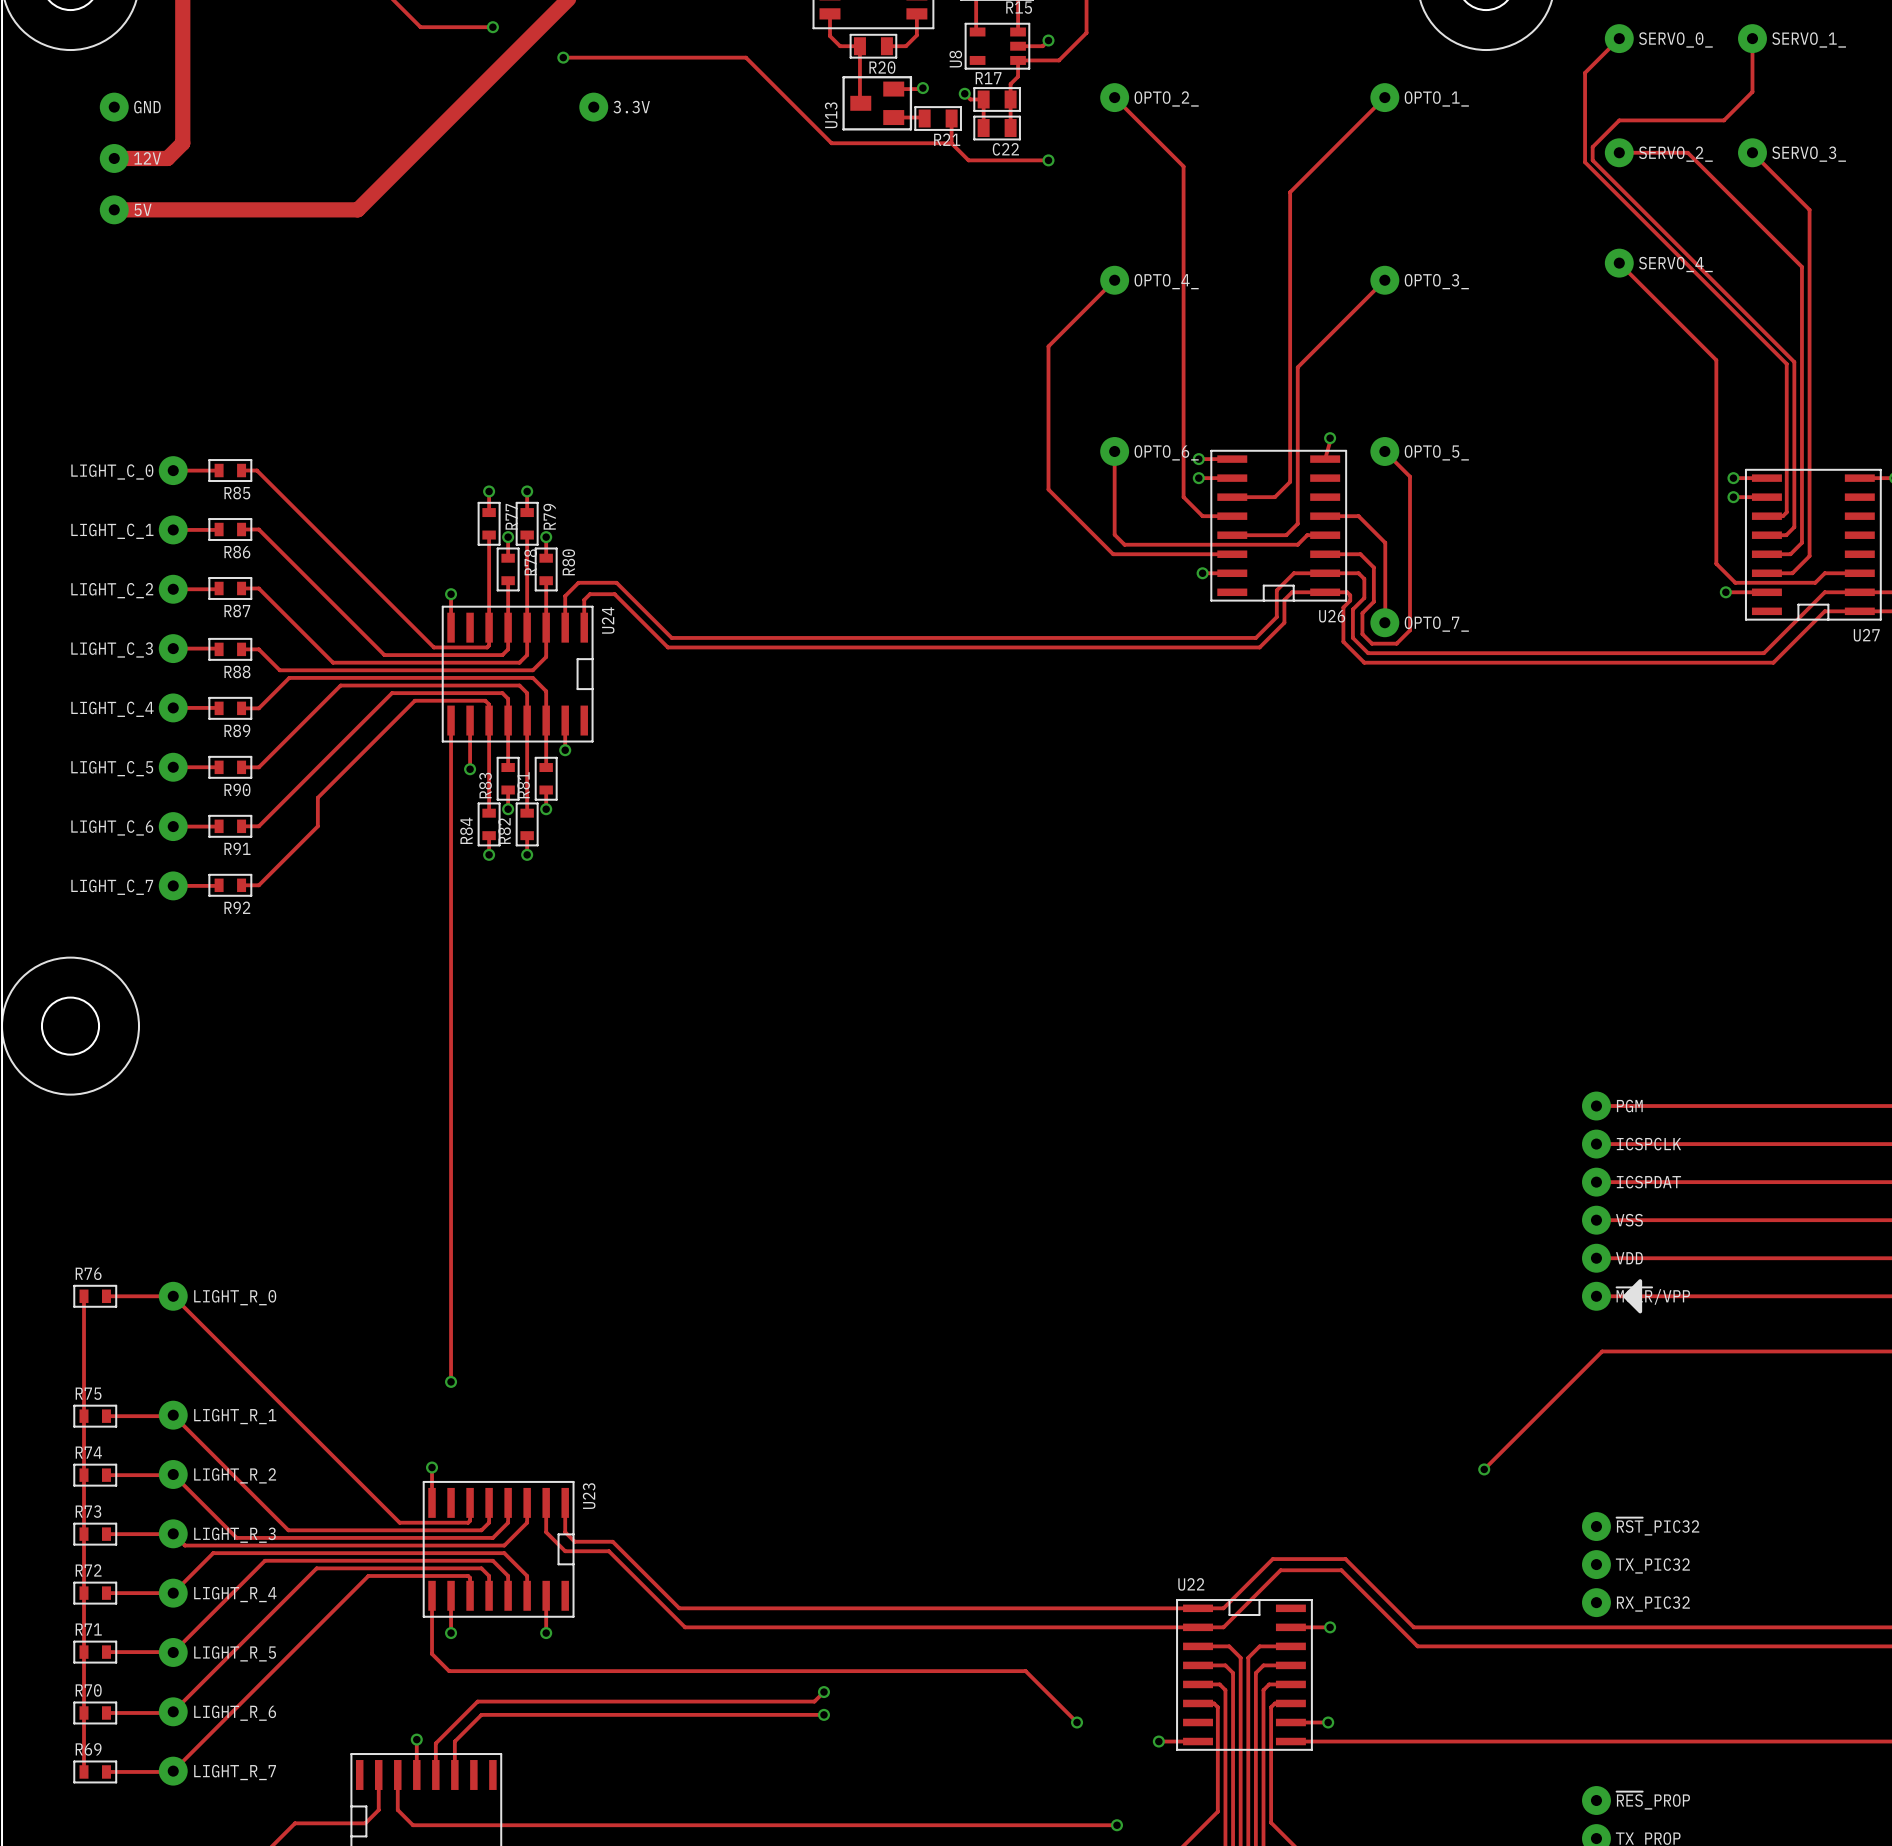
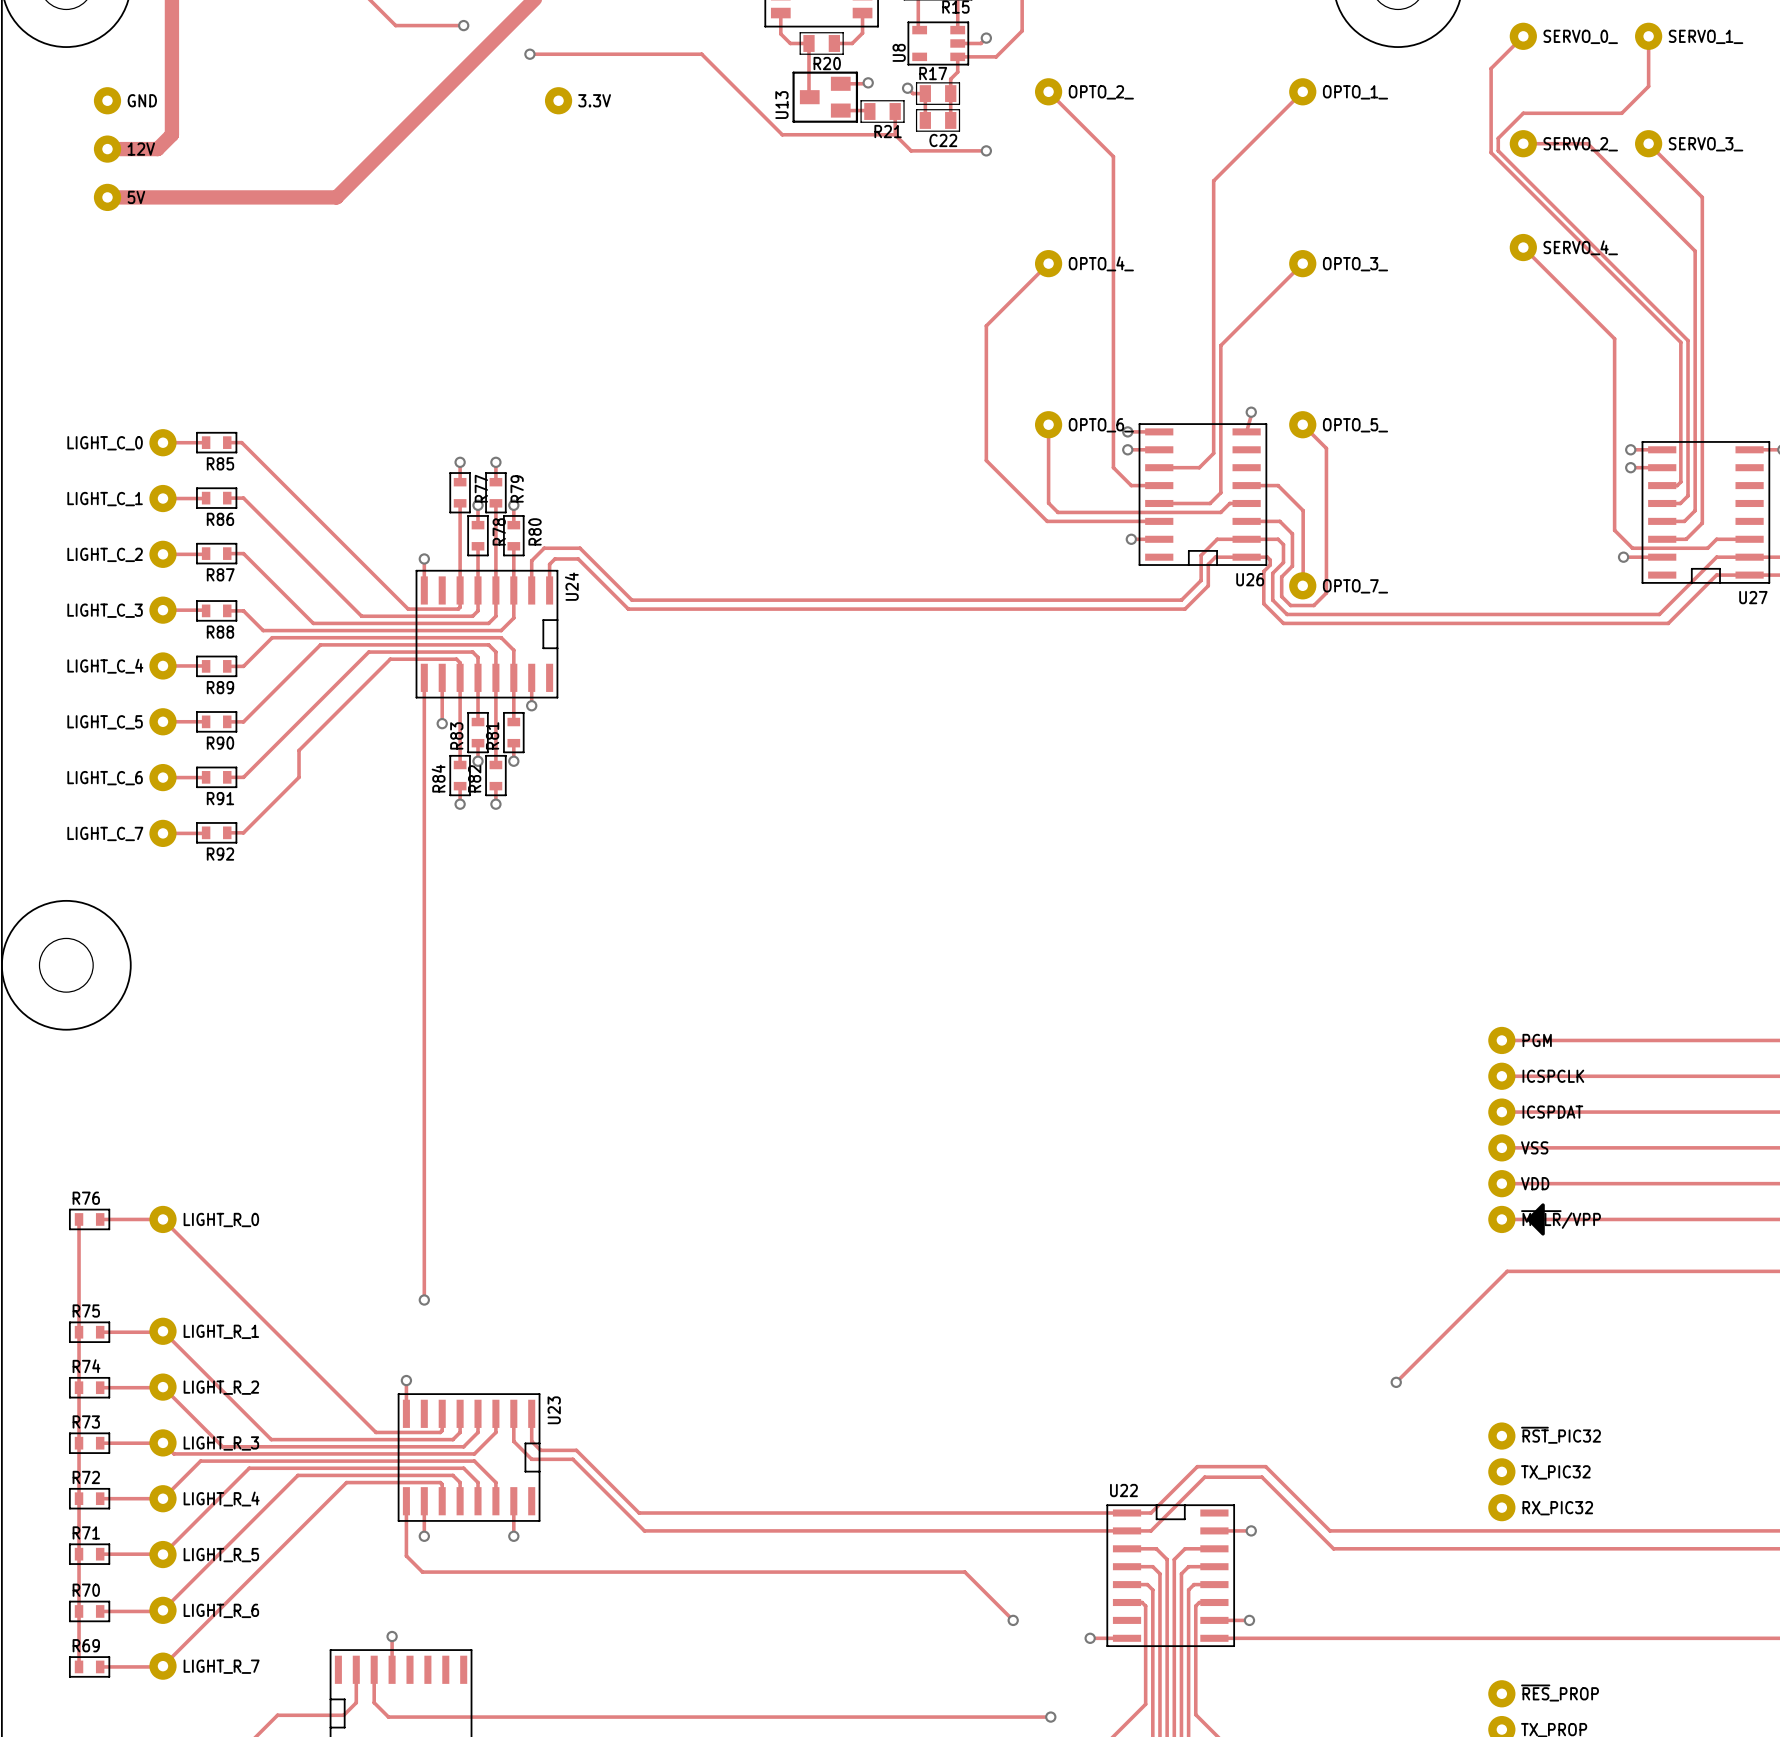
track: (823, 1692) (814, 1701) (477, 1701) (435, 1743) (435, 1774) -> none
via: (823, 1692) -> none
track: (823, 1714) (481, 1714) (454, 1741) (454, 1774) -> none
via: (823, 1714) -> none

